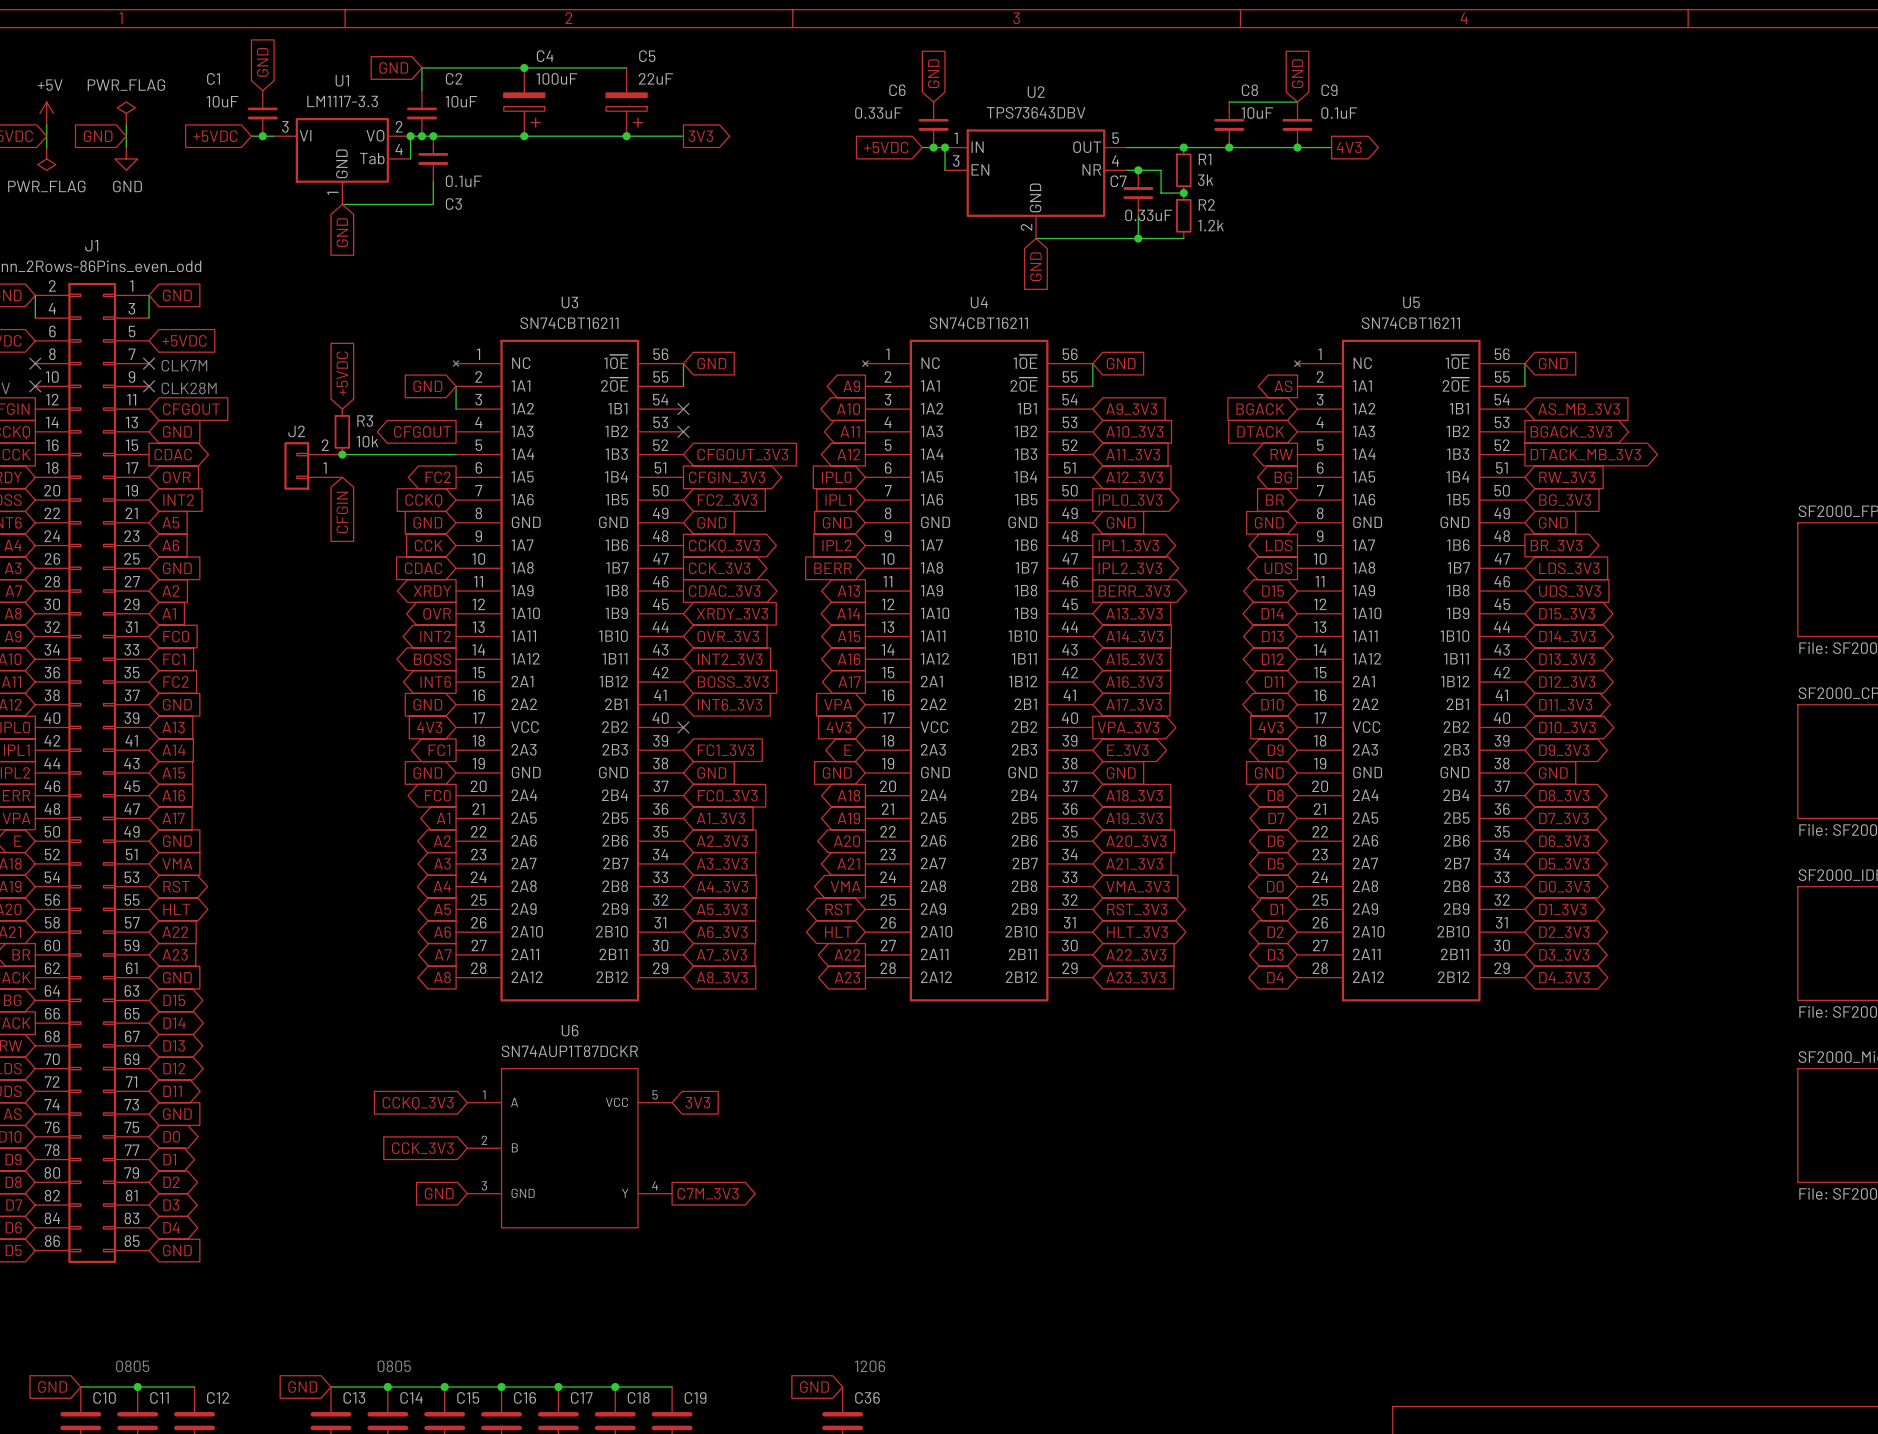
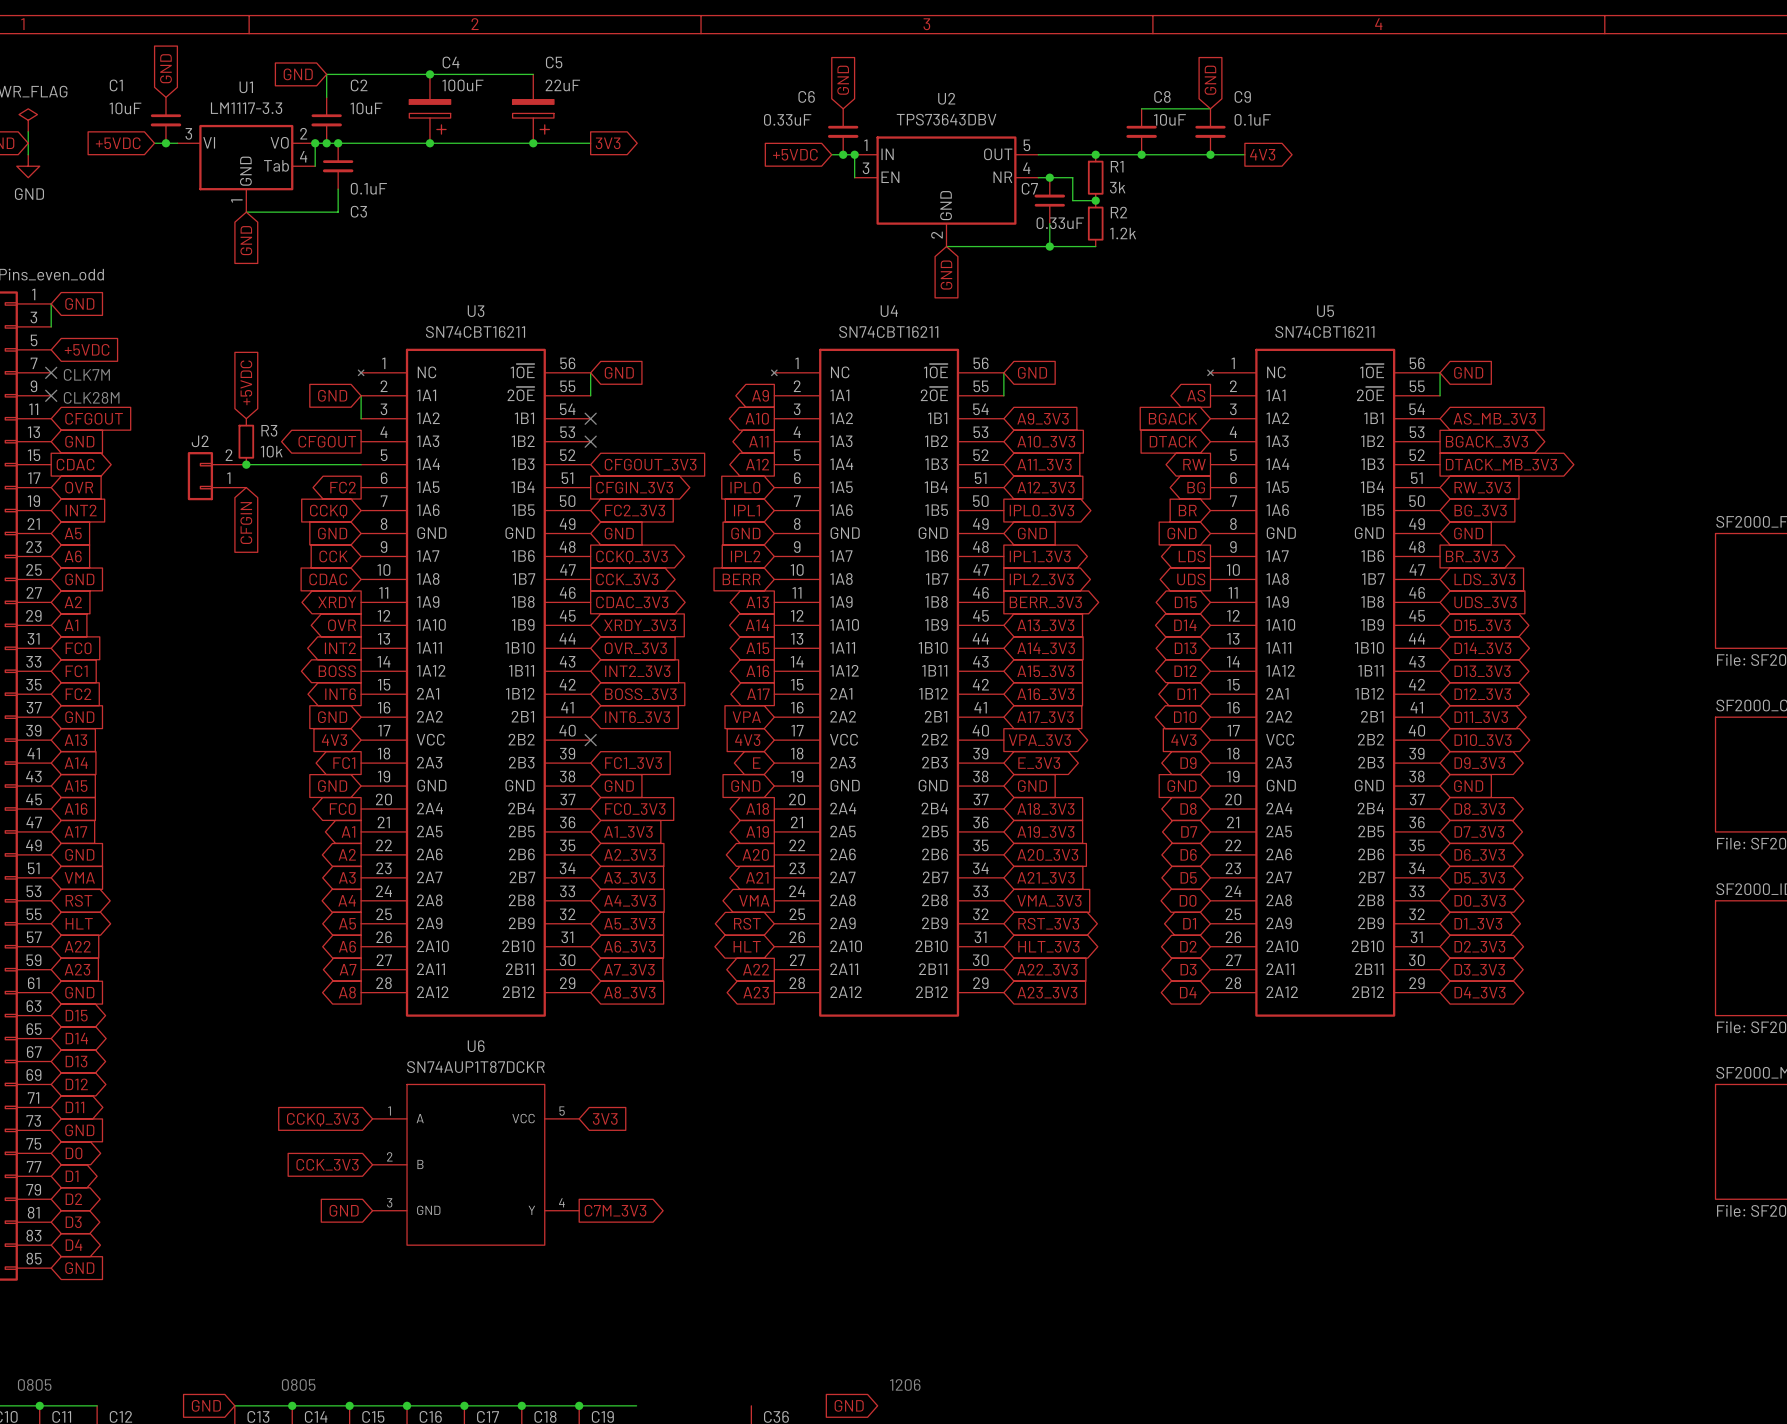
text position: 1206 (870, 1366) -> 1206 (905, 1384)
wire: none -> (579, 1405) (636, 1405)
junction: none -> (579, 1405)
global label position: GND (814, 1386) -> GND (849, 1405)

